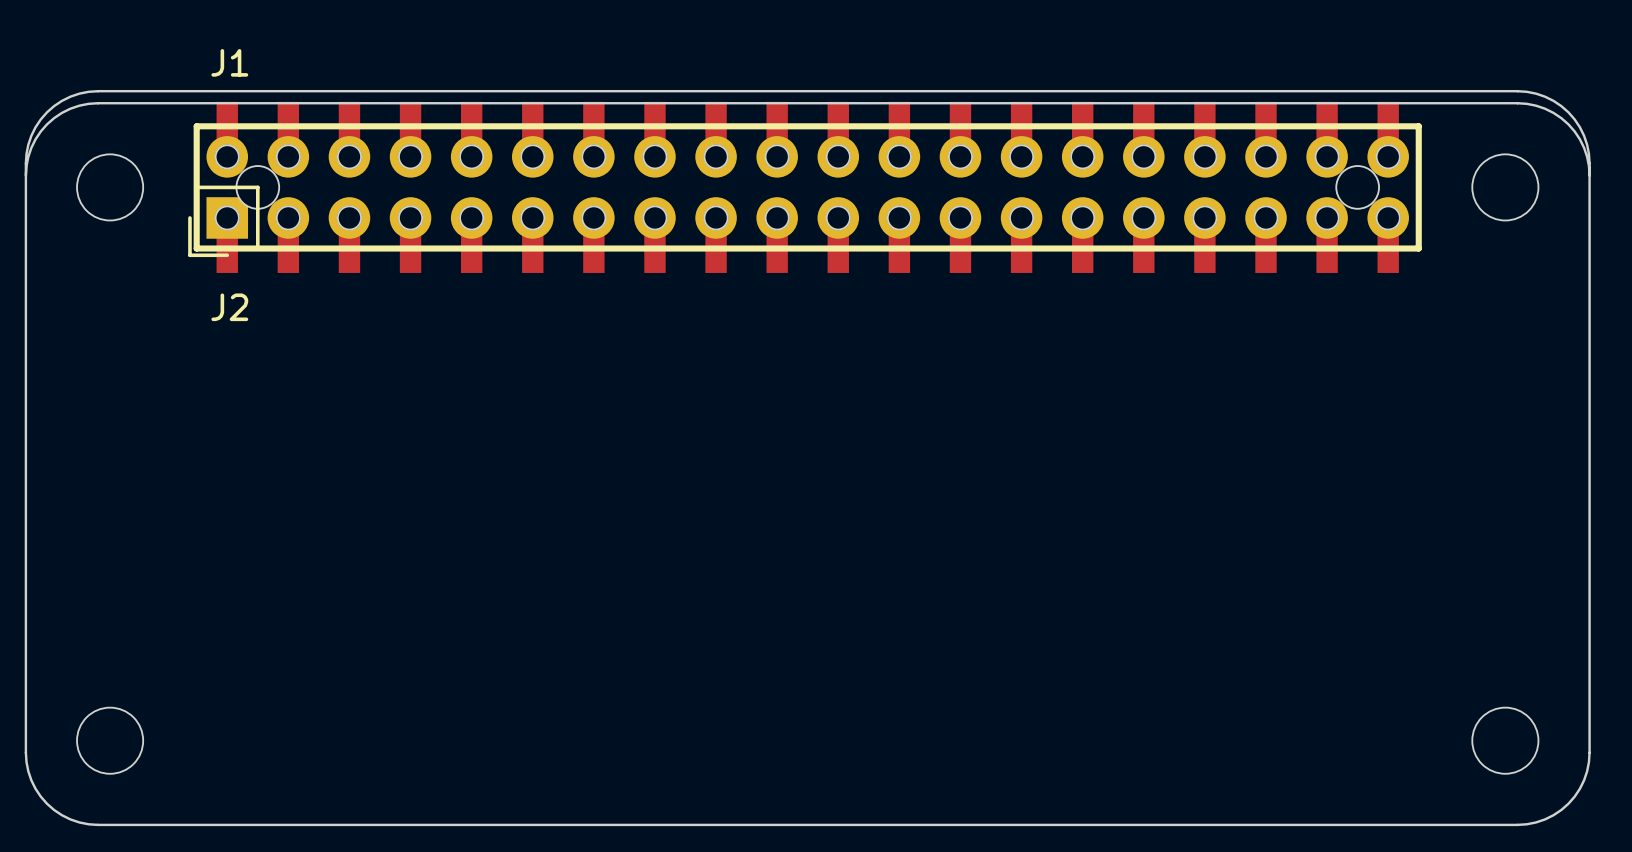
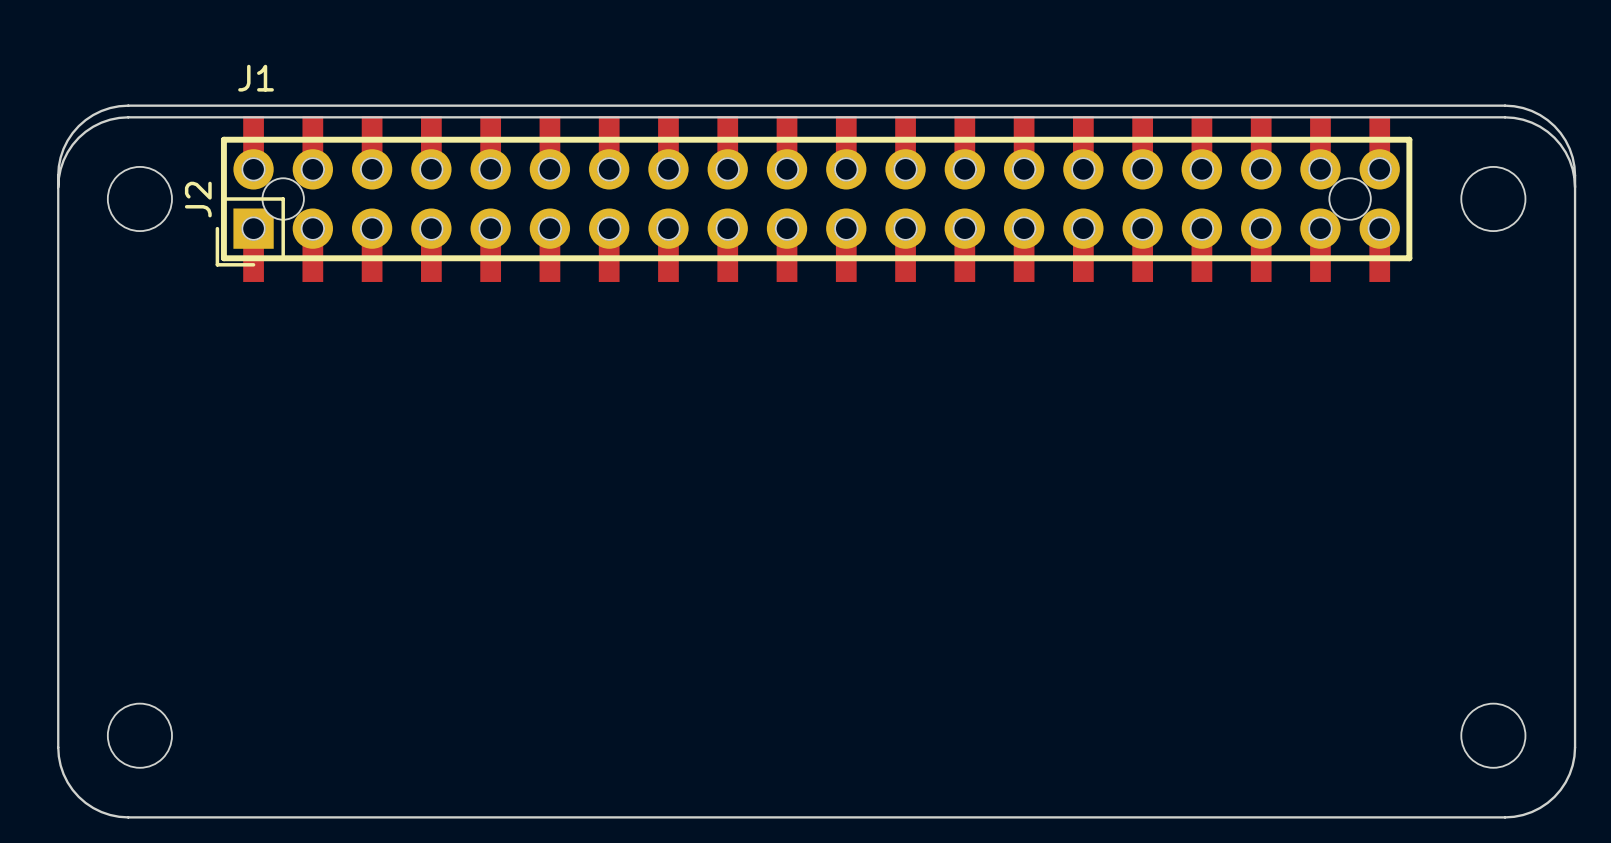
J2 name rotation: 0° (229, 307) -> 90° counterclockwise (198, 199)
J2 name position: J2 (229, 307) -> J2 (198, 199)

